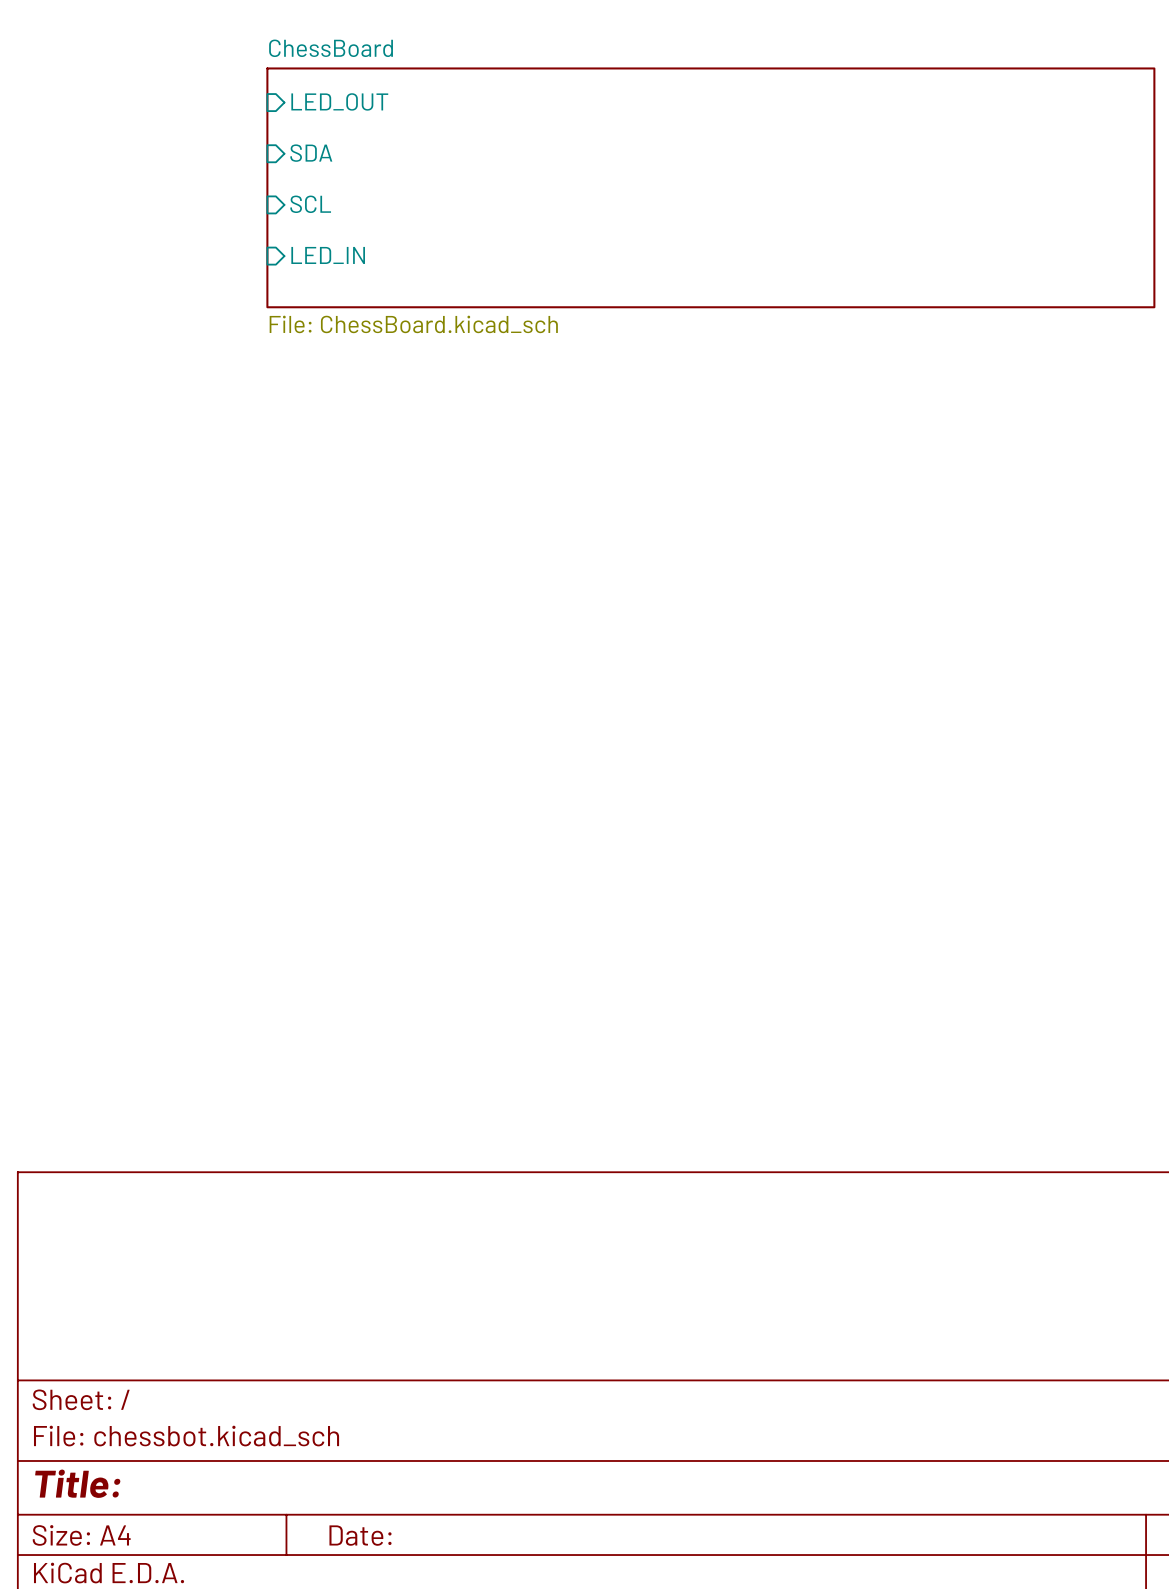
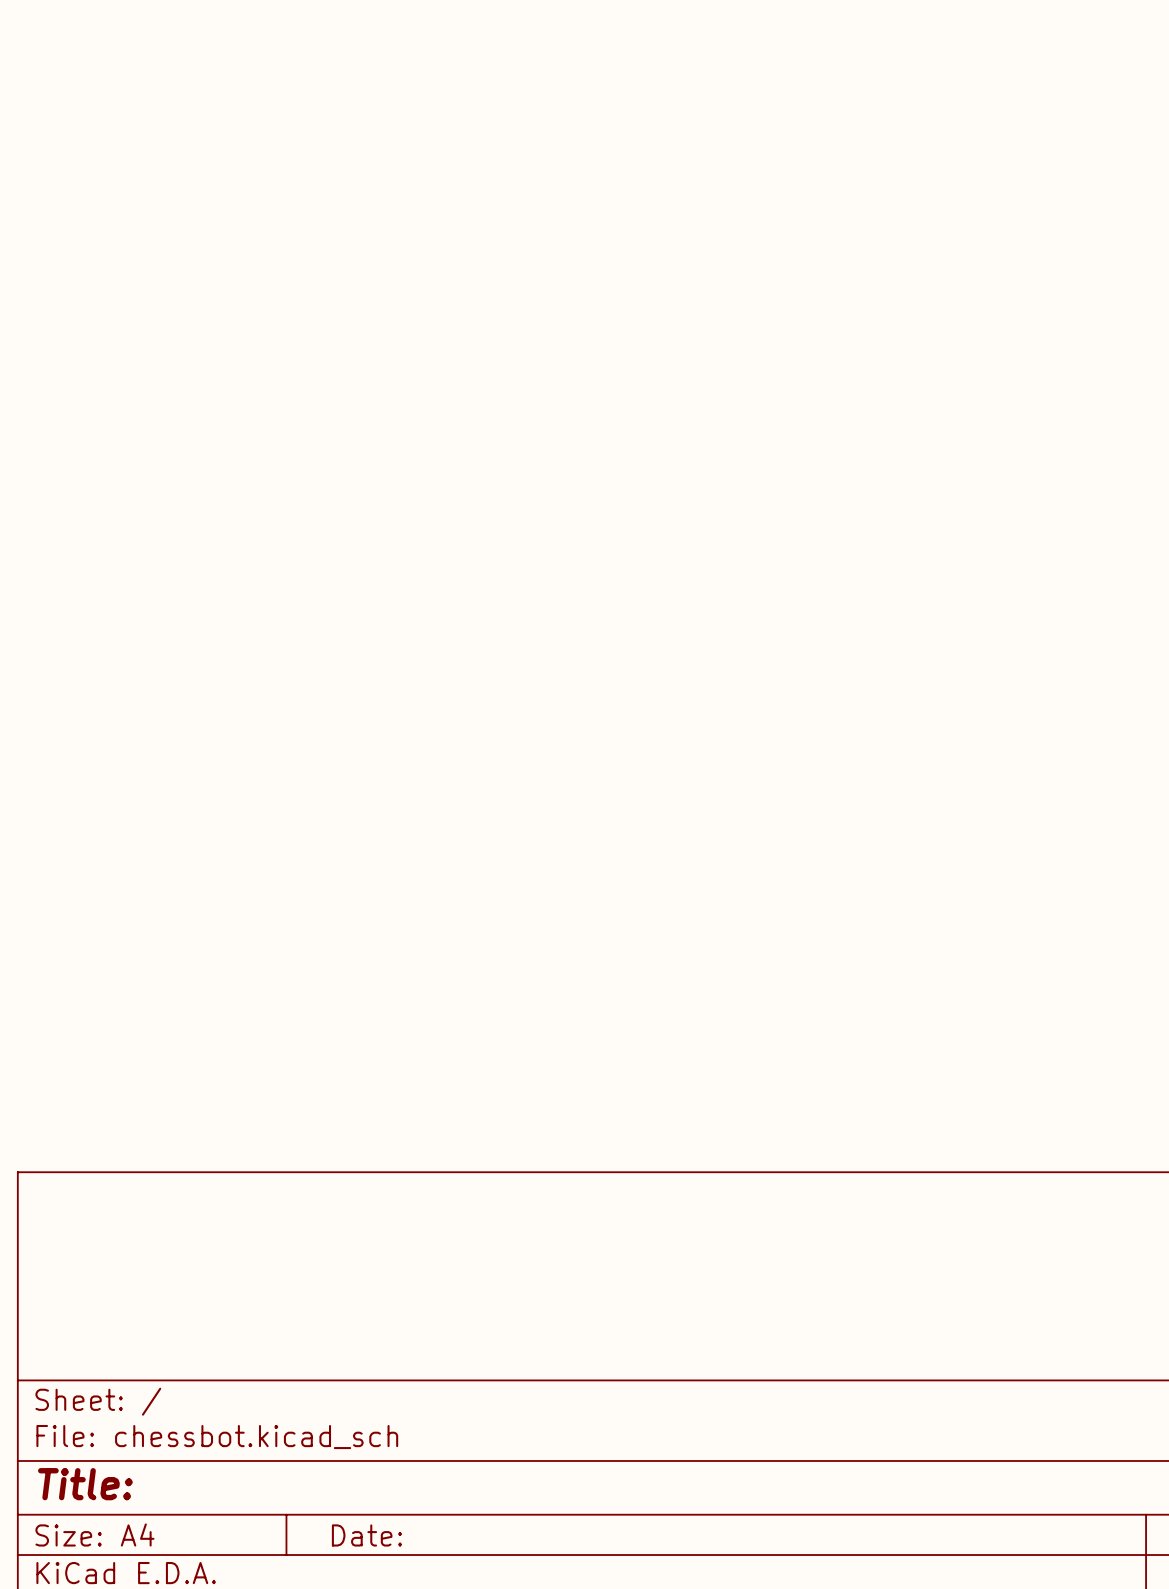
sheet pin: LED_OUT (339, 101) -> none
sheet pin: SDA (311, 153) -> none
sheet ChessBoard: File: ChessBoard.kicad_sch (710, 187) -> none
sheet pin: SCL (310, 204) -> none
sheet pin: LED_IN (328, 255) -> none

